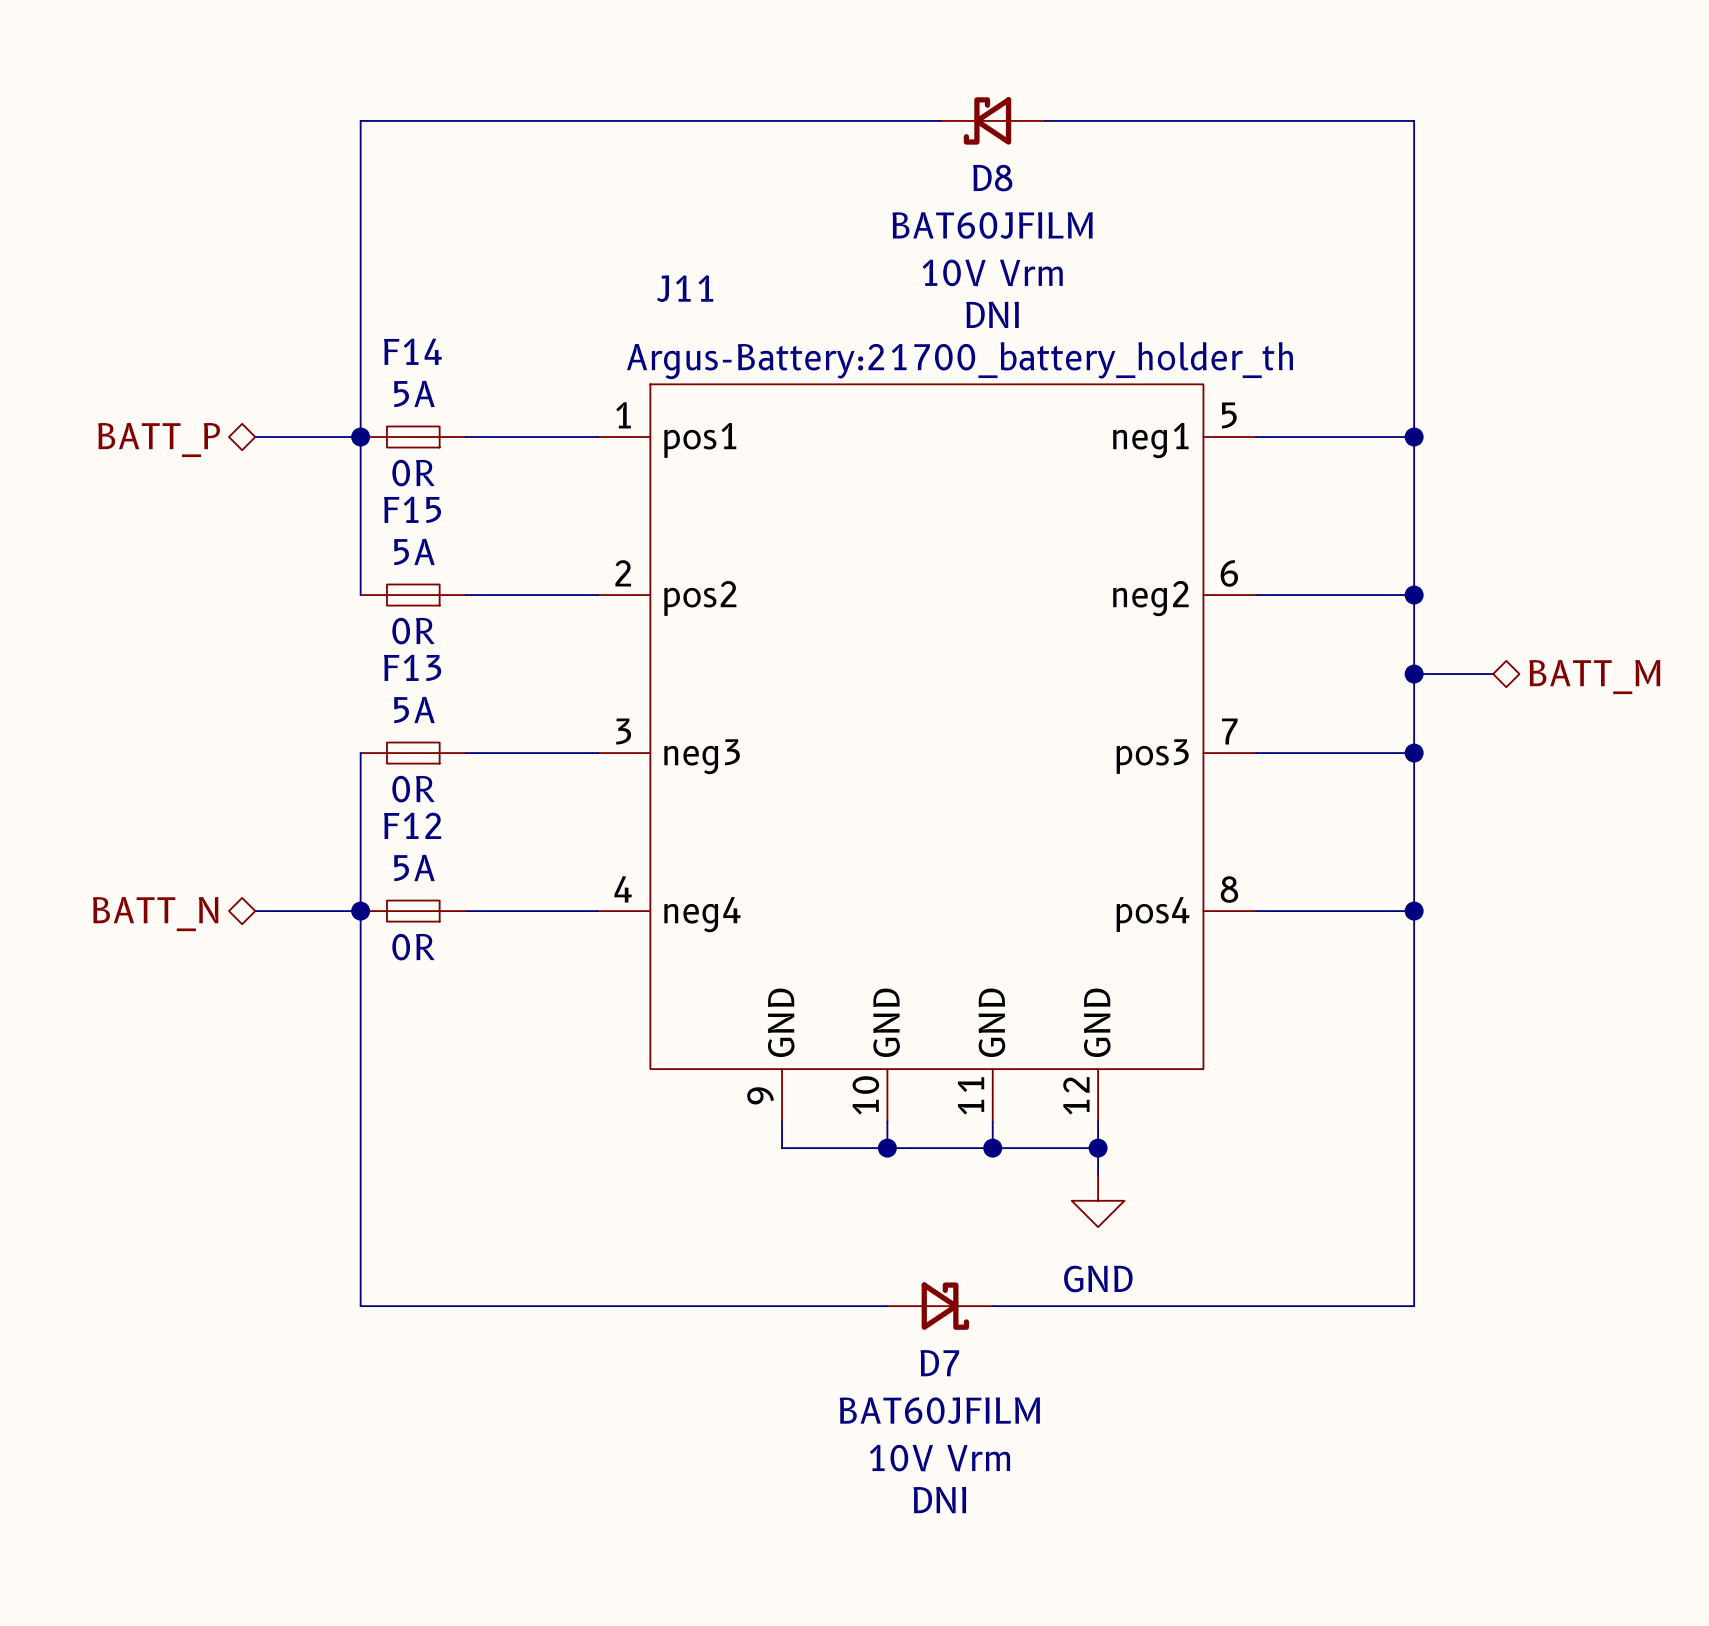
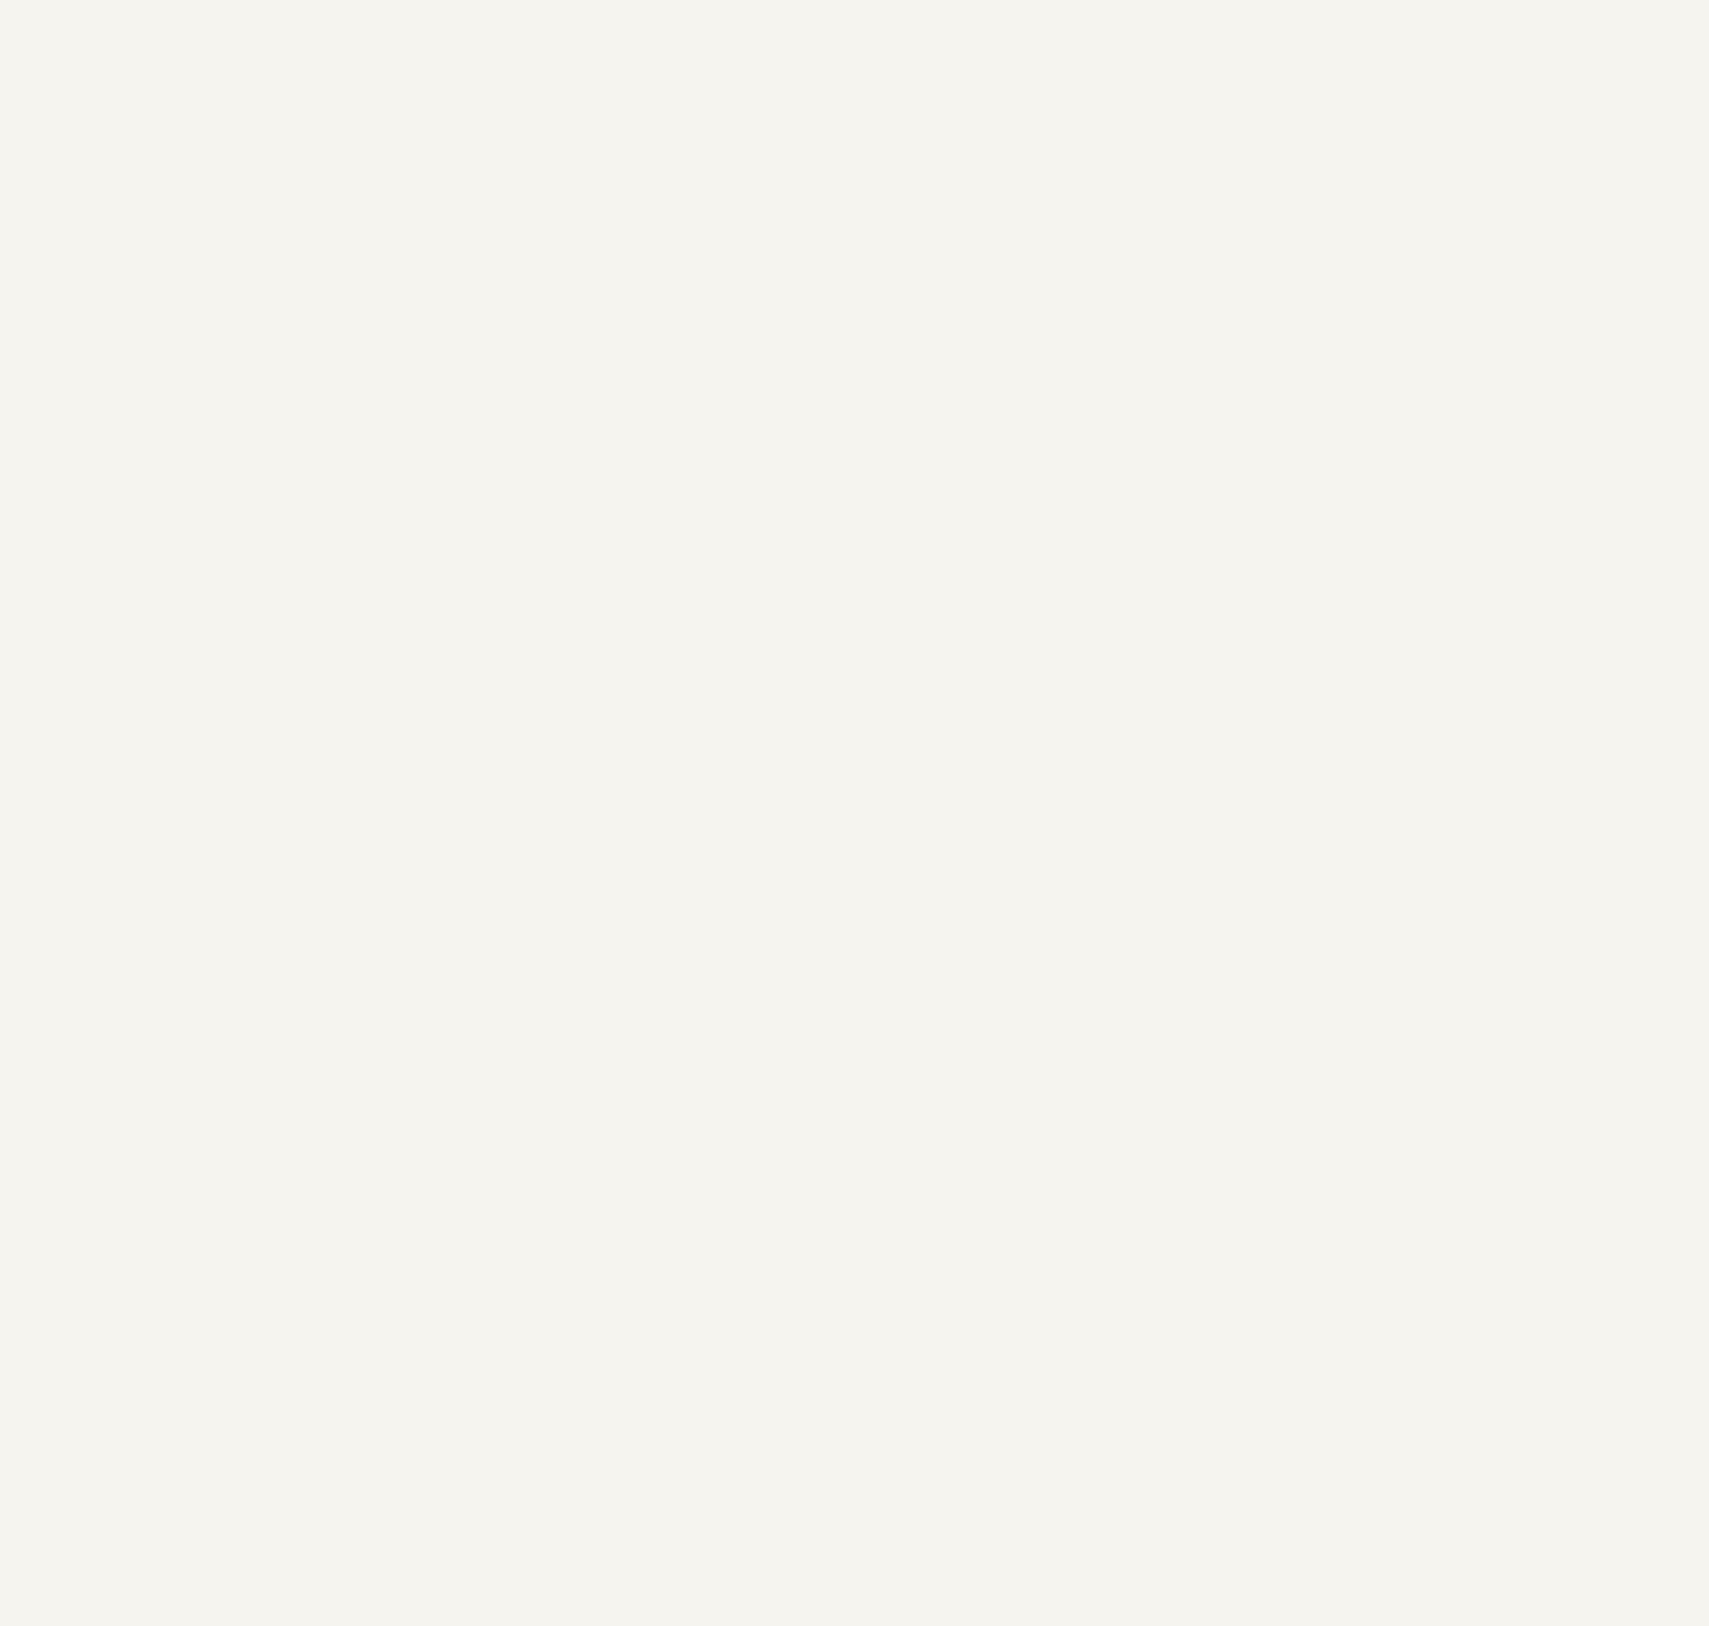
wire: (940, 120) (360, 120) (360, 595) -> none
D8: BAT60JFILM (992, 120) -> none
wire: (1045, 120) (1414, 120) (1414, 1306) (992, 1306) -> none
wire: (255, 437) (360, 437) -> none
junction: (360, 437) -> none
F14: 5A (413, 437) -> none
wire: (465, 437) (597, 437) -> none
wire: (1256, 437) (1414, 437) -> none
junction: (1414, 437) -> none
hierarchical label: BATT_P (159, 439) -> none
F15: 5A (413, 595) -> none
wire: (465, 595) (597, 595) -> none
wire: (1256, 595) (1414, 595) -> none
junction: (1414, 595) -> none
wire: (1414, 674) (1493, 674) -> none
junction: (1414, 674) -> none
hierarchical label: BATT_M (1594, 677) -> none
wire: (360, 753) (360, 1306) (887, 1306) -> none
F13: 5A (413, 753) -> none
wire: (465, 753) (597, 753) -> none
J11: (926, 753) -> none
wire: (1256, 753) (1414, 753) -> none
junction: (1414, 753) -> none
wire: (255, 911) (360, 911) -> none
junction: (360, 911) -> none
F12: 5A (413, 911) -> none
wire: (465, 911) (597, 911) -> none
wire: (1256, 911) (1414, 911) -> none
junction: (1414, 911) -> none
hierarchical label: BATT_N (155, 914) -> none
wire: (782, 1121) (782, 1148) (1098, 1148) -> none
wire: (887, 1121) (887, 1148) -> none
wire: (992, 1121) (992, 1148) -> none
wire: (1098, 1121) (1098, 1174) -> none
junction: (887, 1148) -> none
junction: (992, 1148) -> none
junction: (1098, 1148) -> none
power symbol: GND (1098, 1200) -> none
D7: BAT60JFILM (940, 1306) -> none

